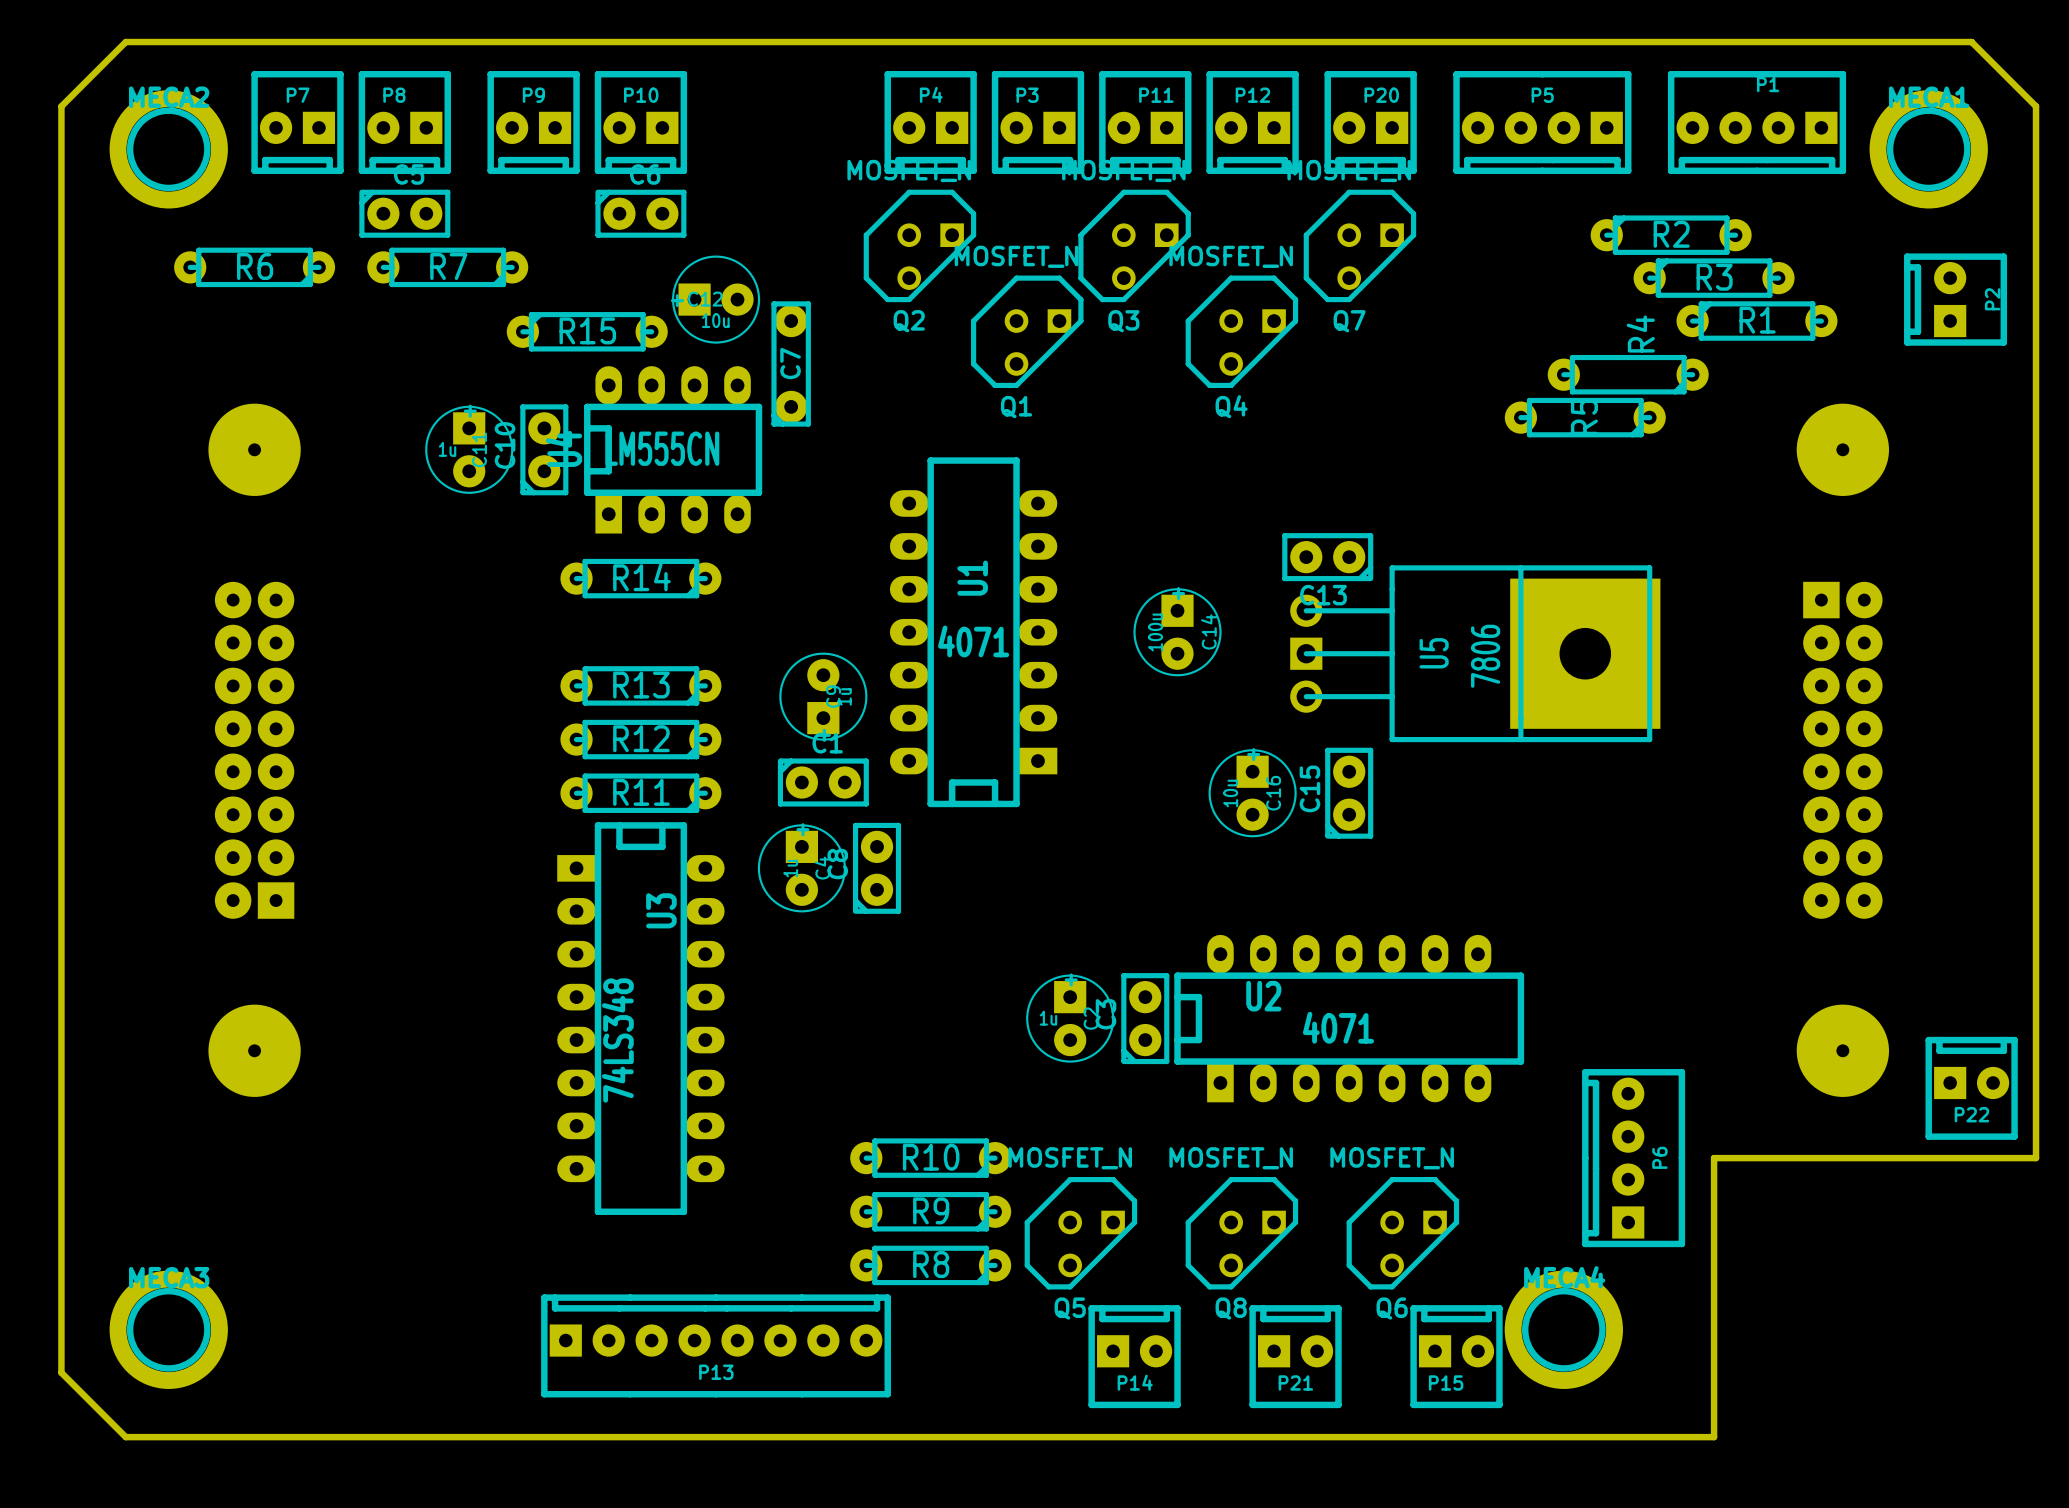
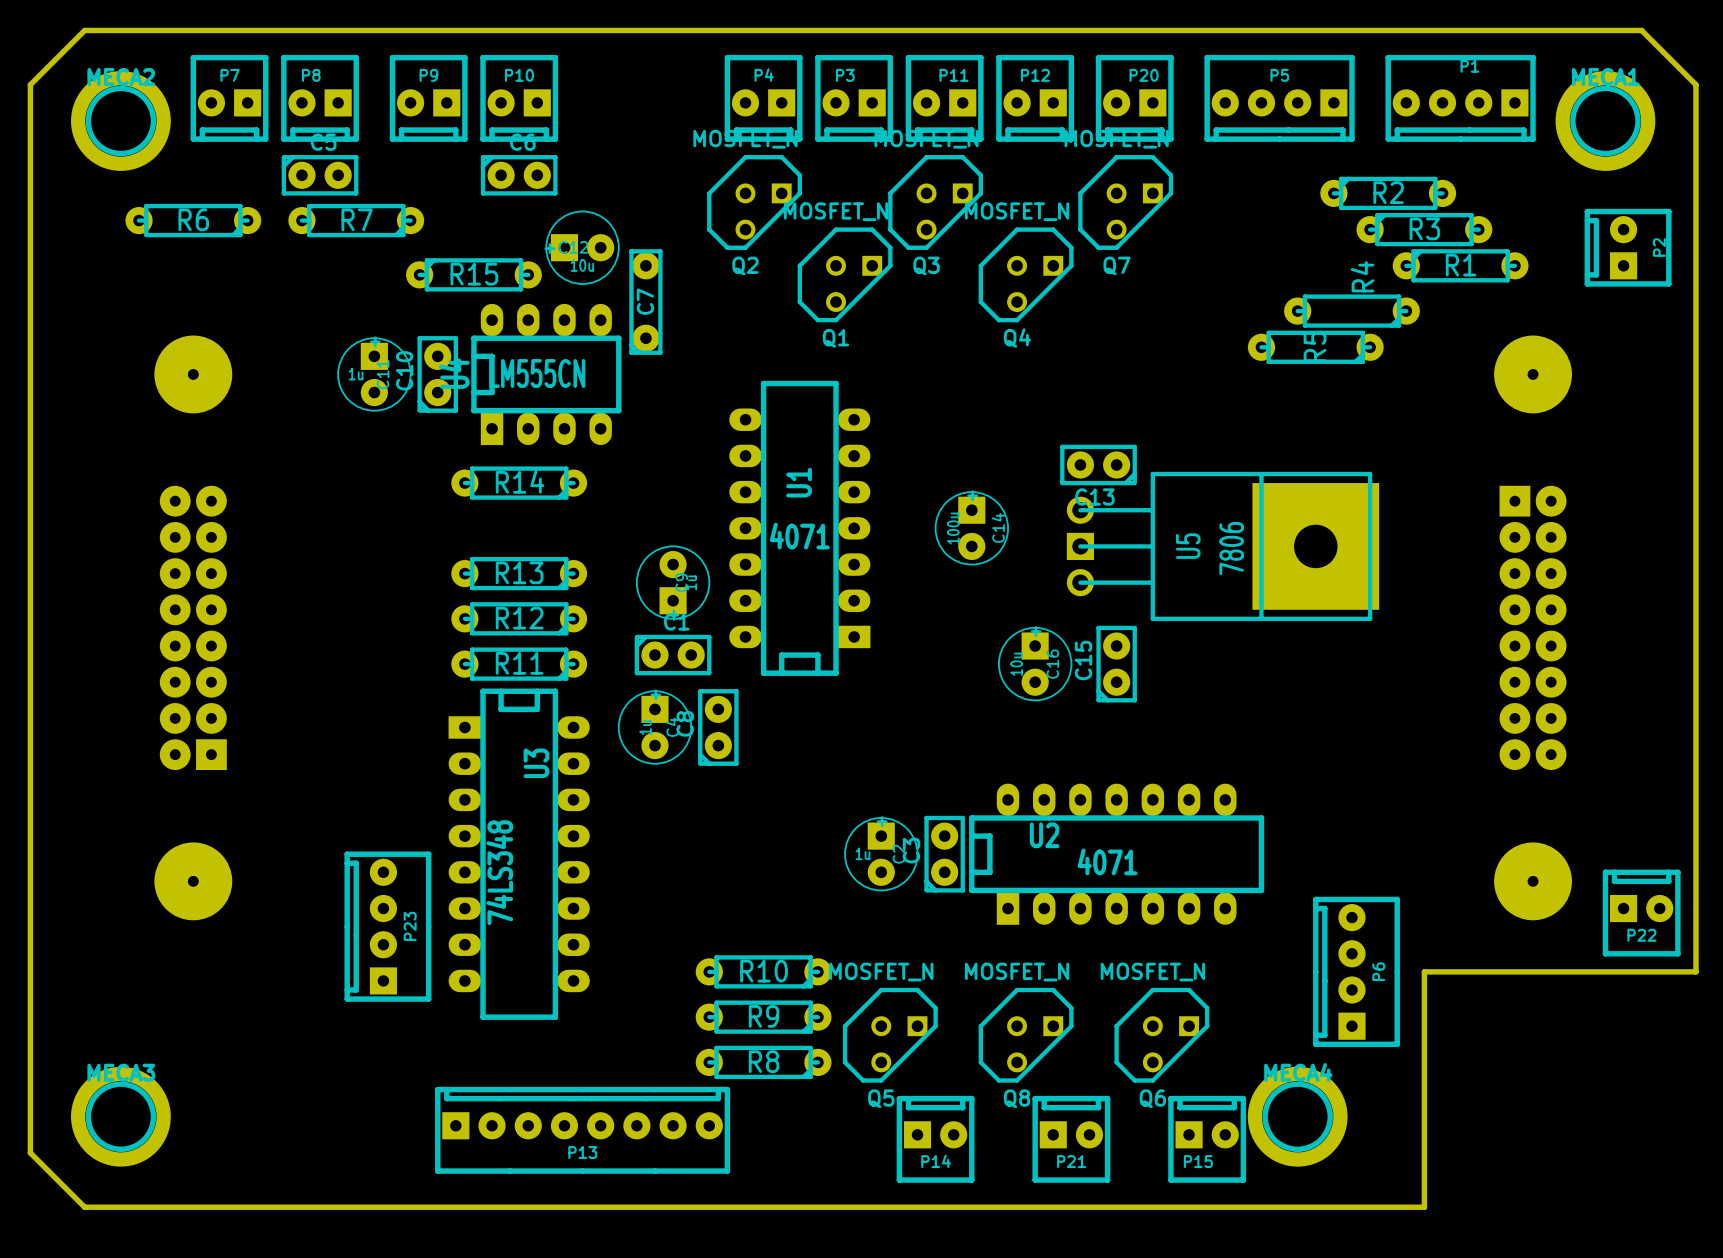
P23: none -> (387, 926)

